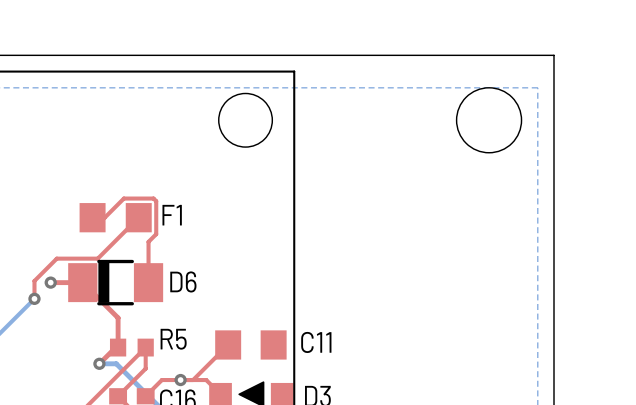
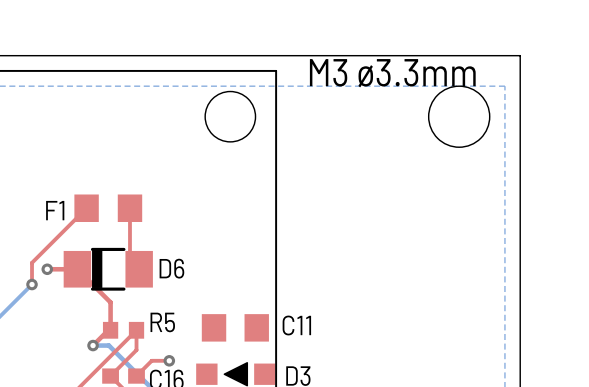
text: none -> M3 ø3.3mm (392, 73)
F1 name position: F1 (172, 215) -> F1 (55, 210)
top track: (92, 217) (104, 217) (123, 198) (153, 198) (156, 201) (156, 234) (148, 241) (148, 282) -> (129, 208) (129, 260) (139, 269)
top track: (138, 217) (97, 258) (56, 258) (34, 280) -> (86, 208) (32, 262) (32, 267)
top track: (228, 344) (193, 380) -> none
top track: (180, 380) (206, 380) (220, 394) -> none

